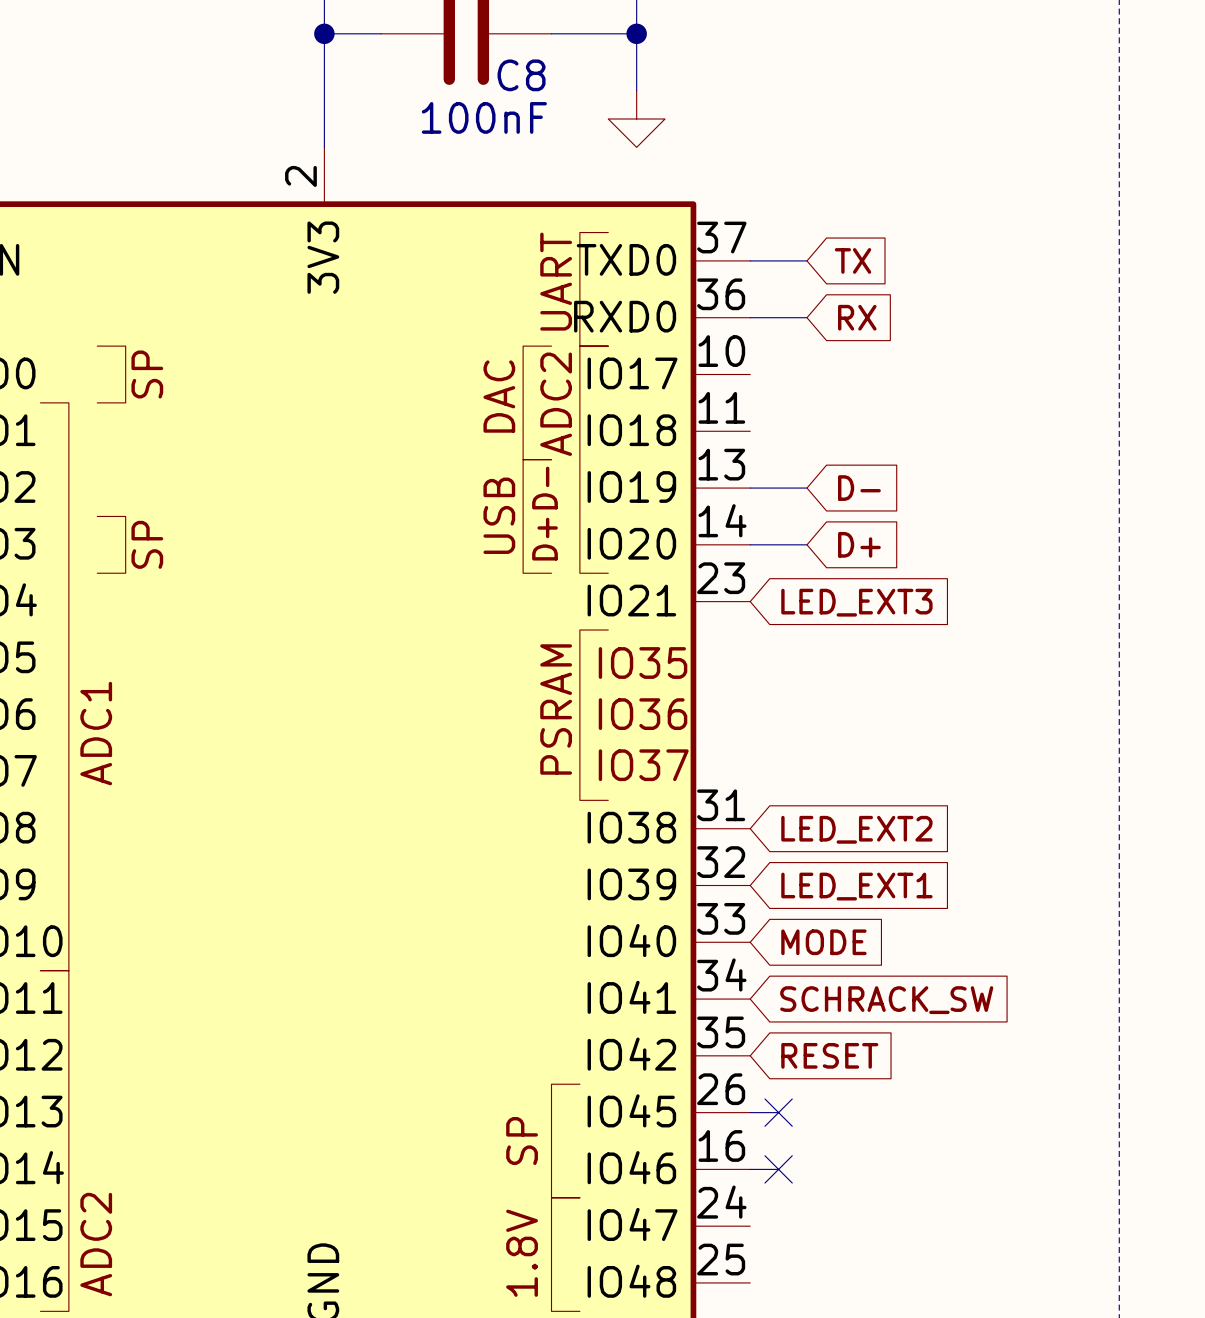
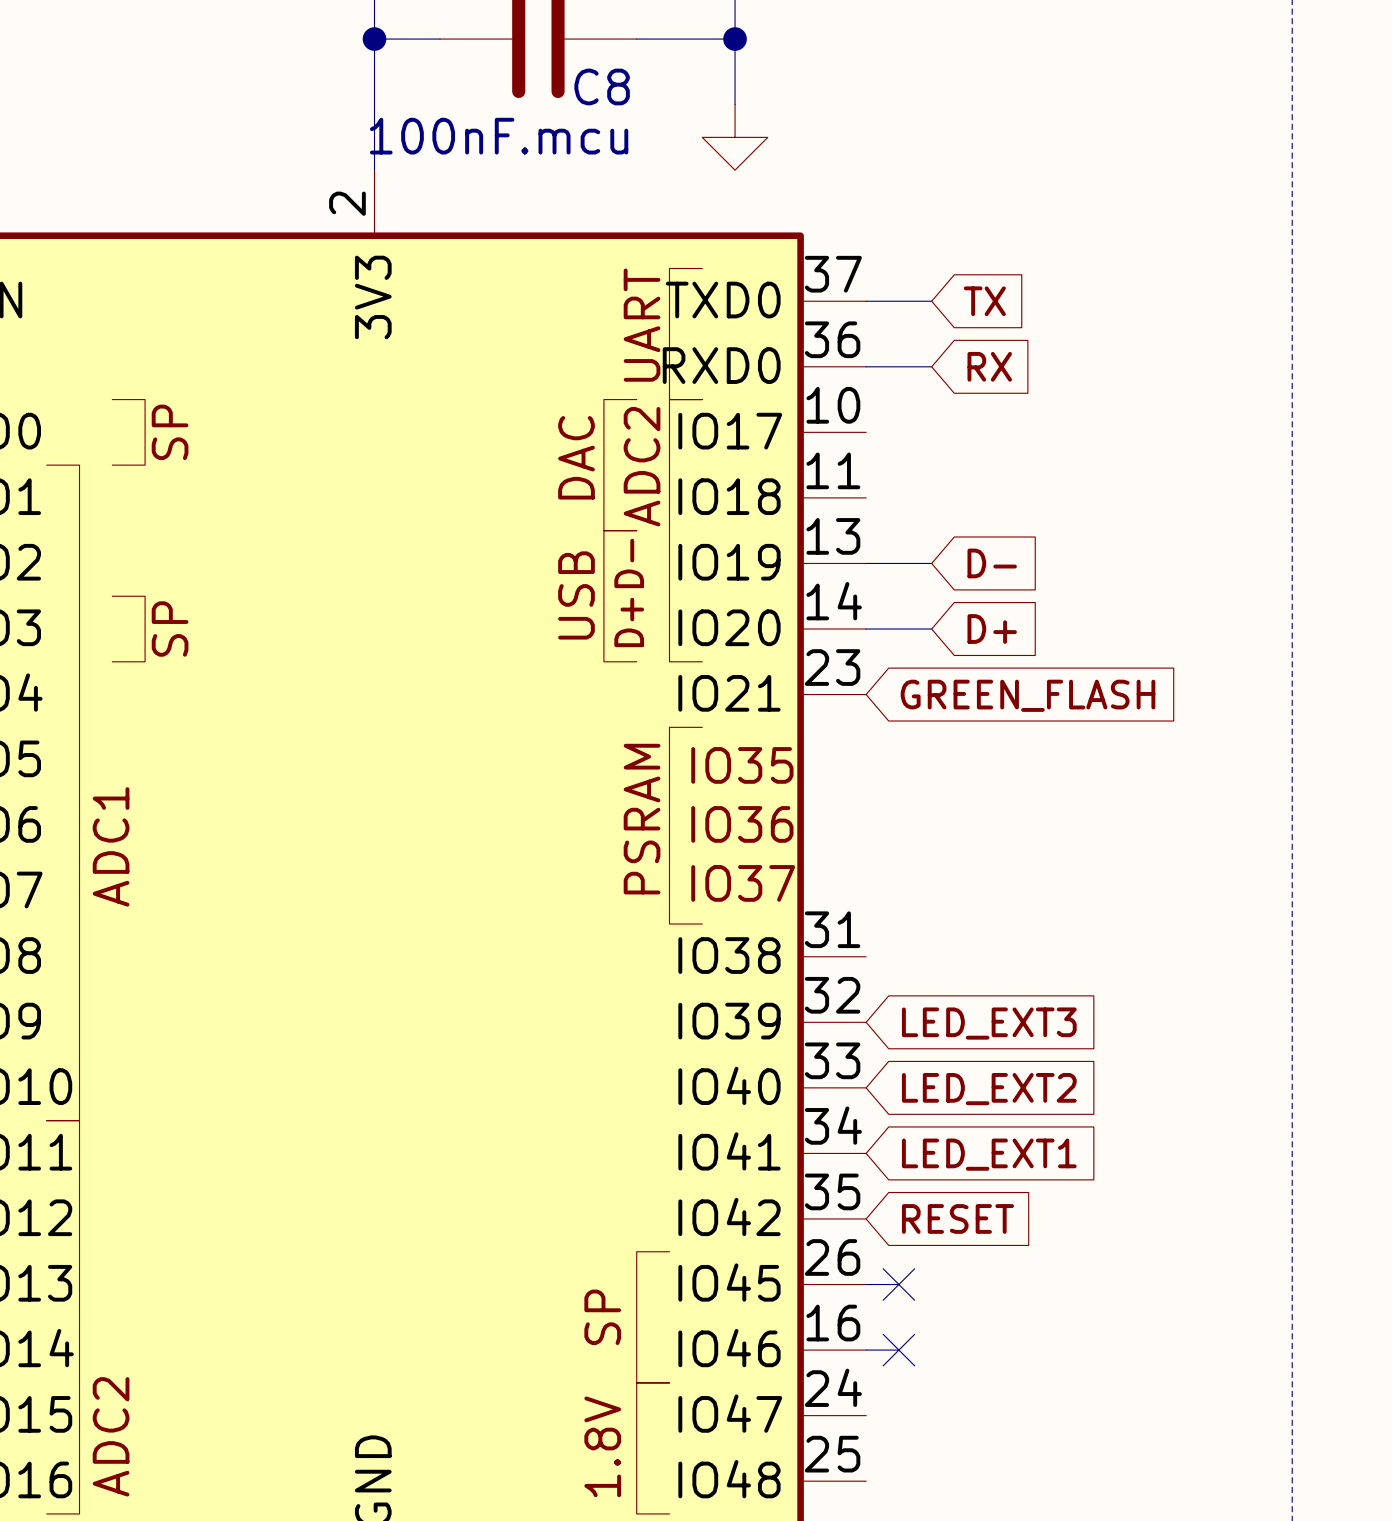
C8 value: 100nF (484, 117) -> 100nF.mcu (499, 136)
global label: LED_EXT3 (856, 602) -> GREEN_FLASH (1028, 695)
global label: LED_EXT2 (856, 829) -> none
global label: LED_EXT1 (856, 886) -> LED_EXT3 (989, 1023)
global label: MODE (823, 942) -> LED_EXT2 (989, 1089)
global label: SCHRACK_SW (886, 1000) -> LED_EXT1 (989, 1154)

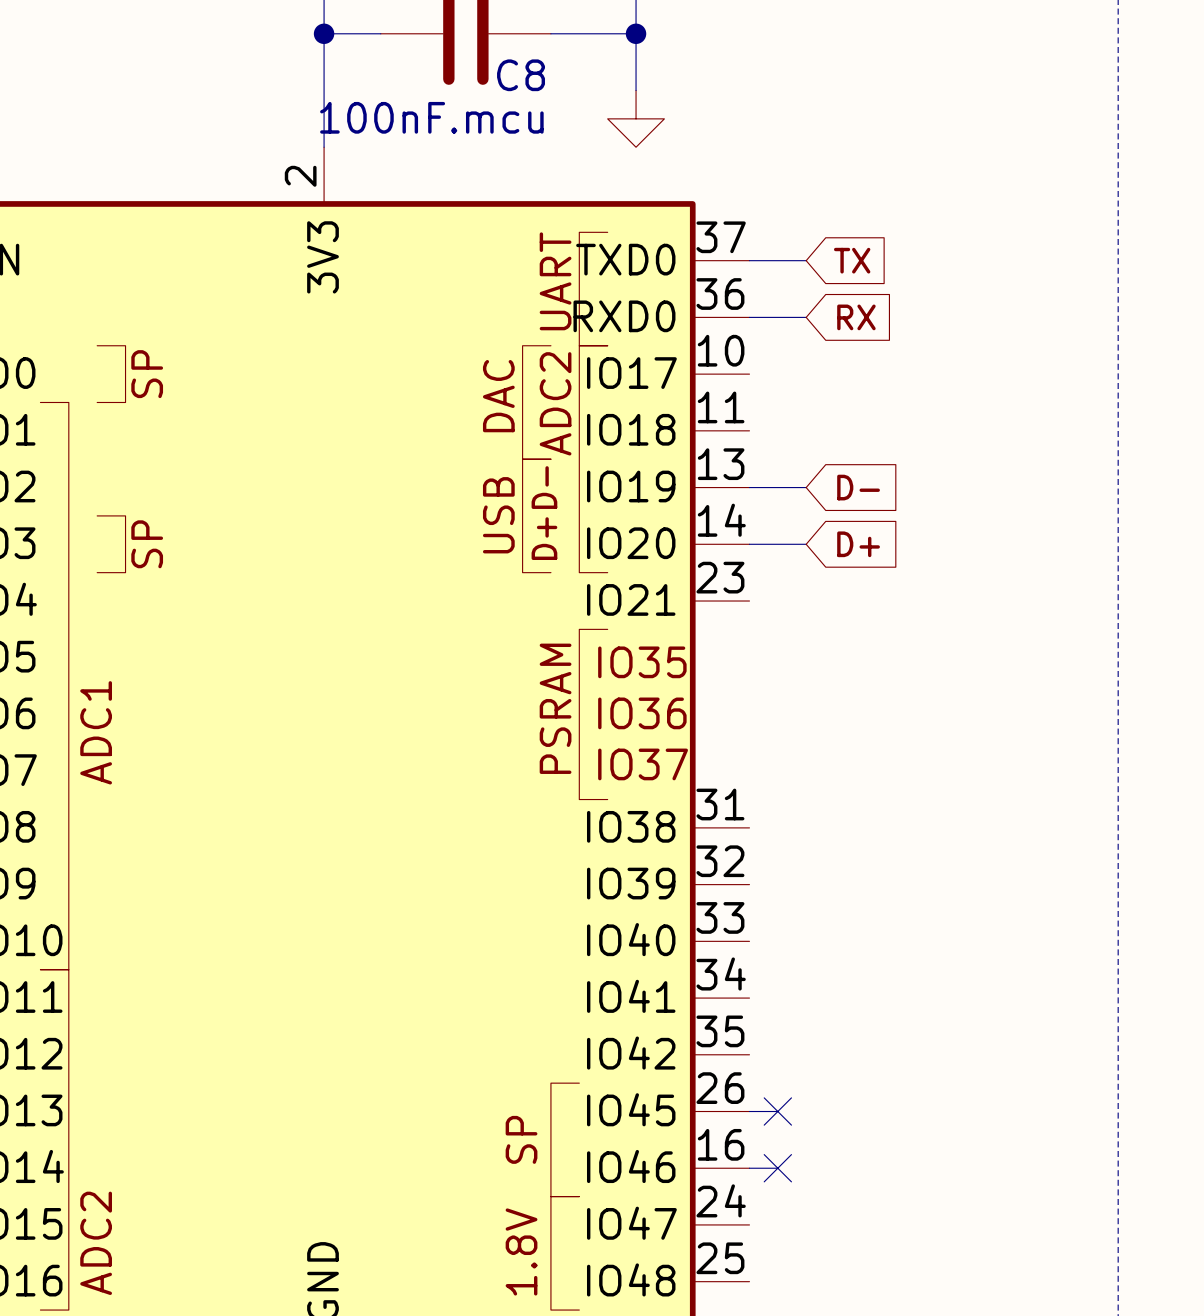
global label: GREEN_FLASH (1028, 695) -> none
global label: LED_EXT3 (989, 1023) -> none
global label: LED_EXT2 (989, 1089) -> none
global label: LED_EXT1 (989, 1154) -> none
global label: RESET (957, 1218) -> none

